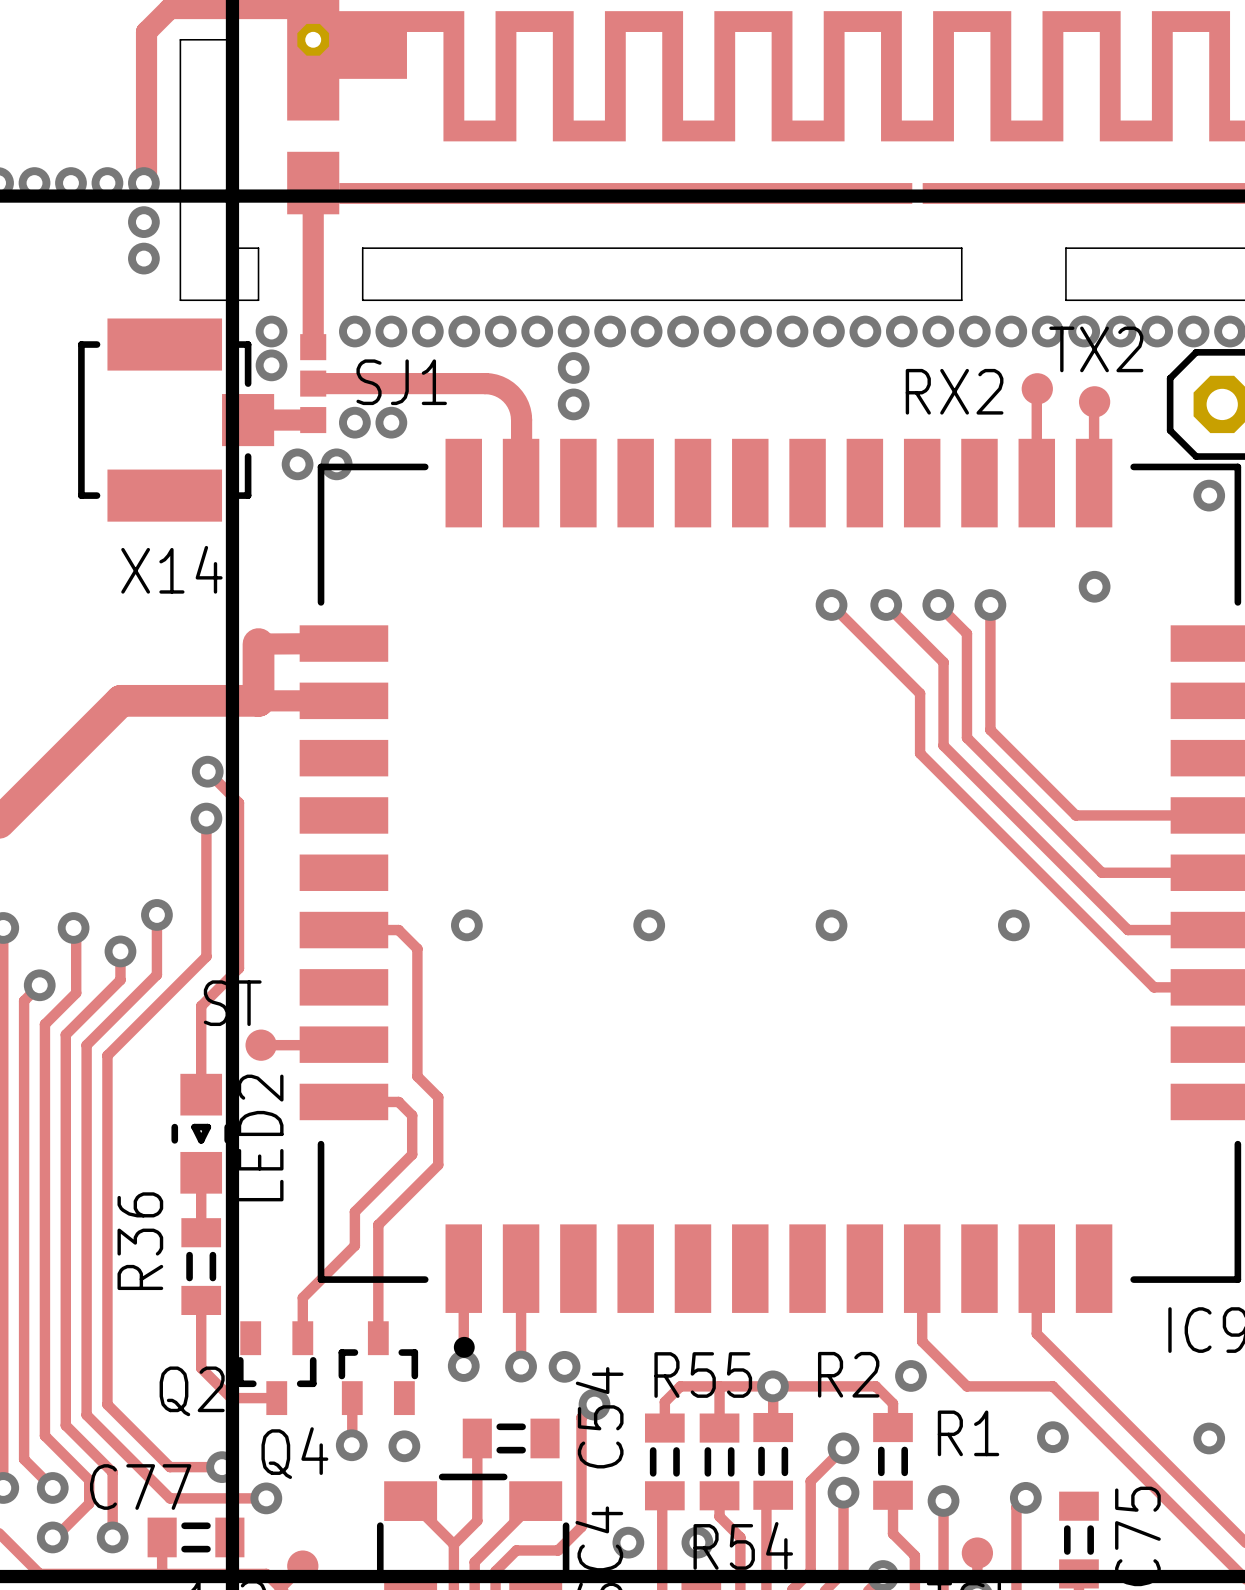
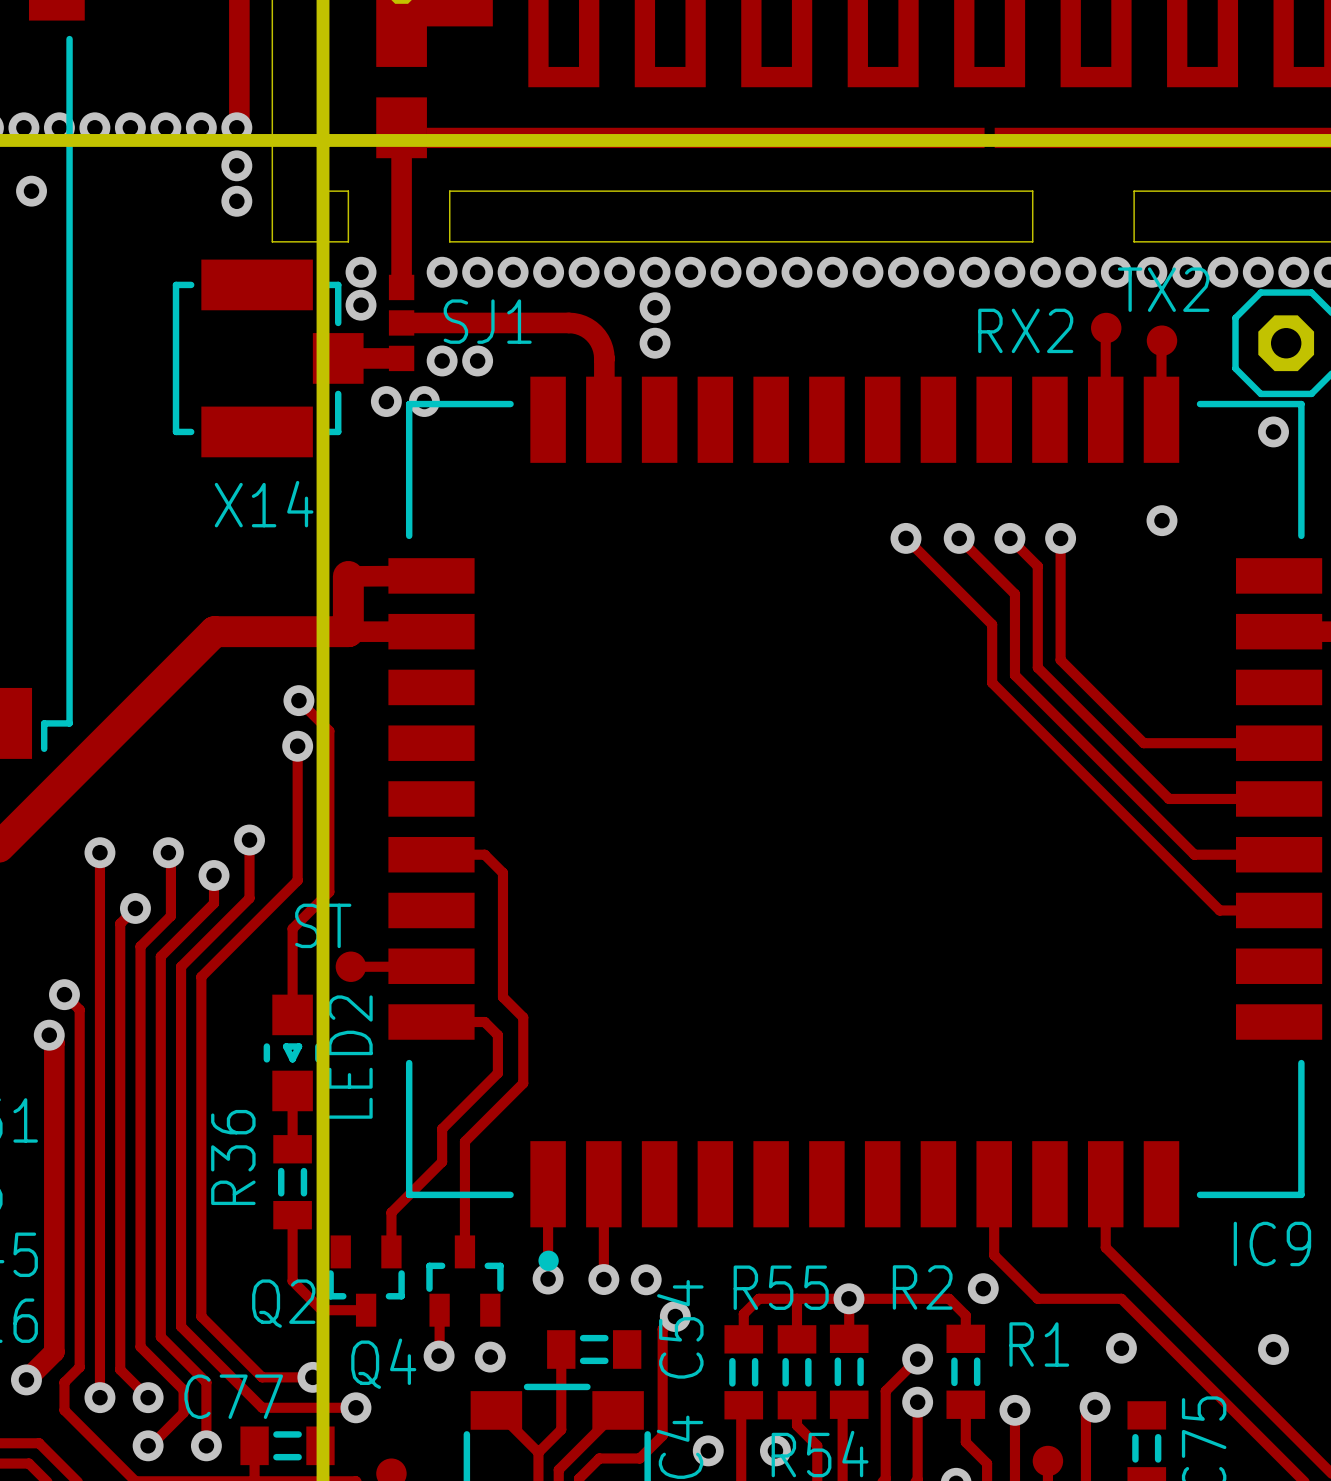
via: (466, 925) -> none
via: (649, 925) -> none
via: (831, 925) -> none
via: (1013, 925) -> none

